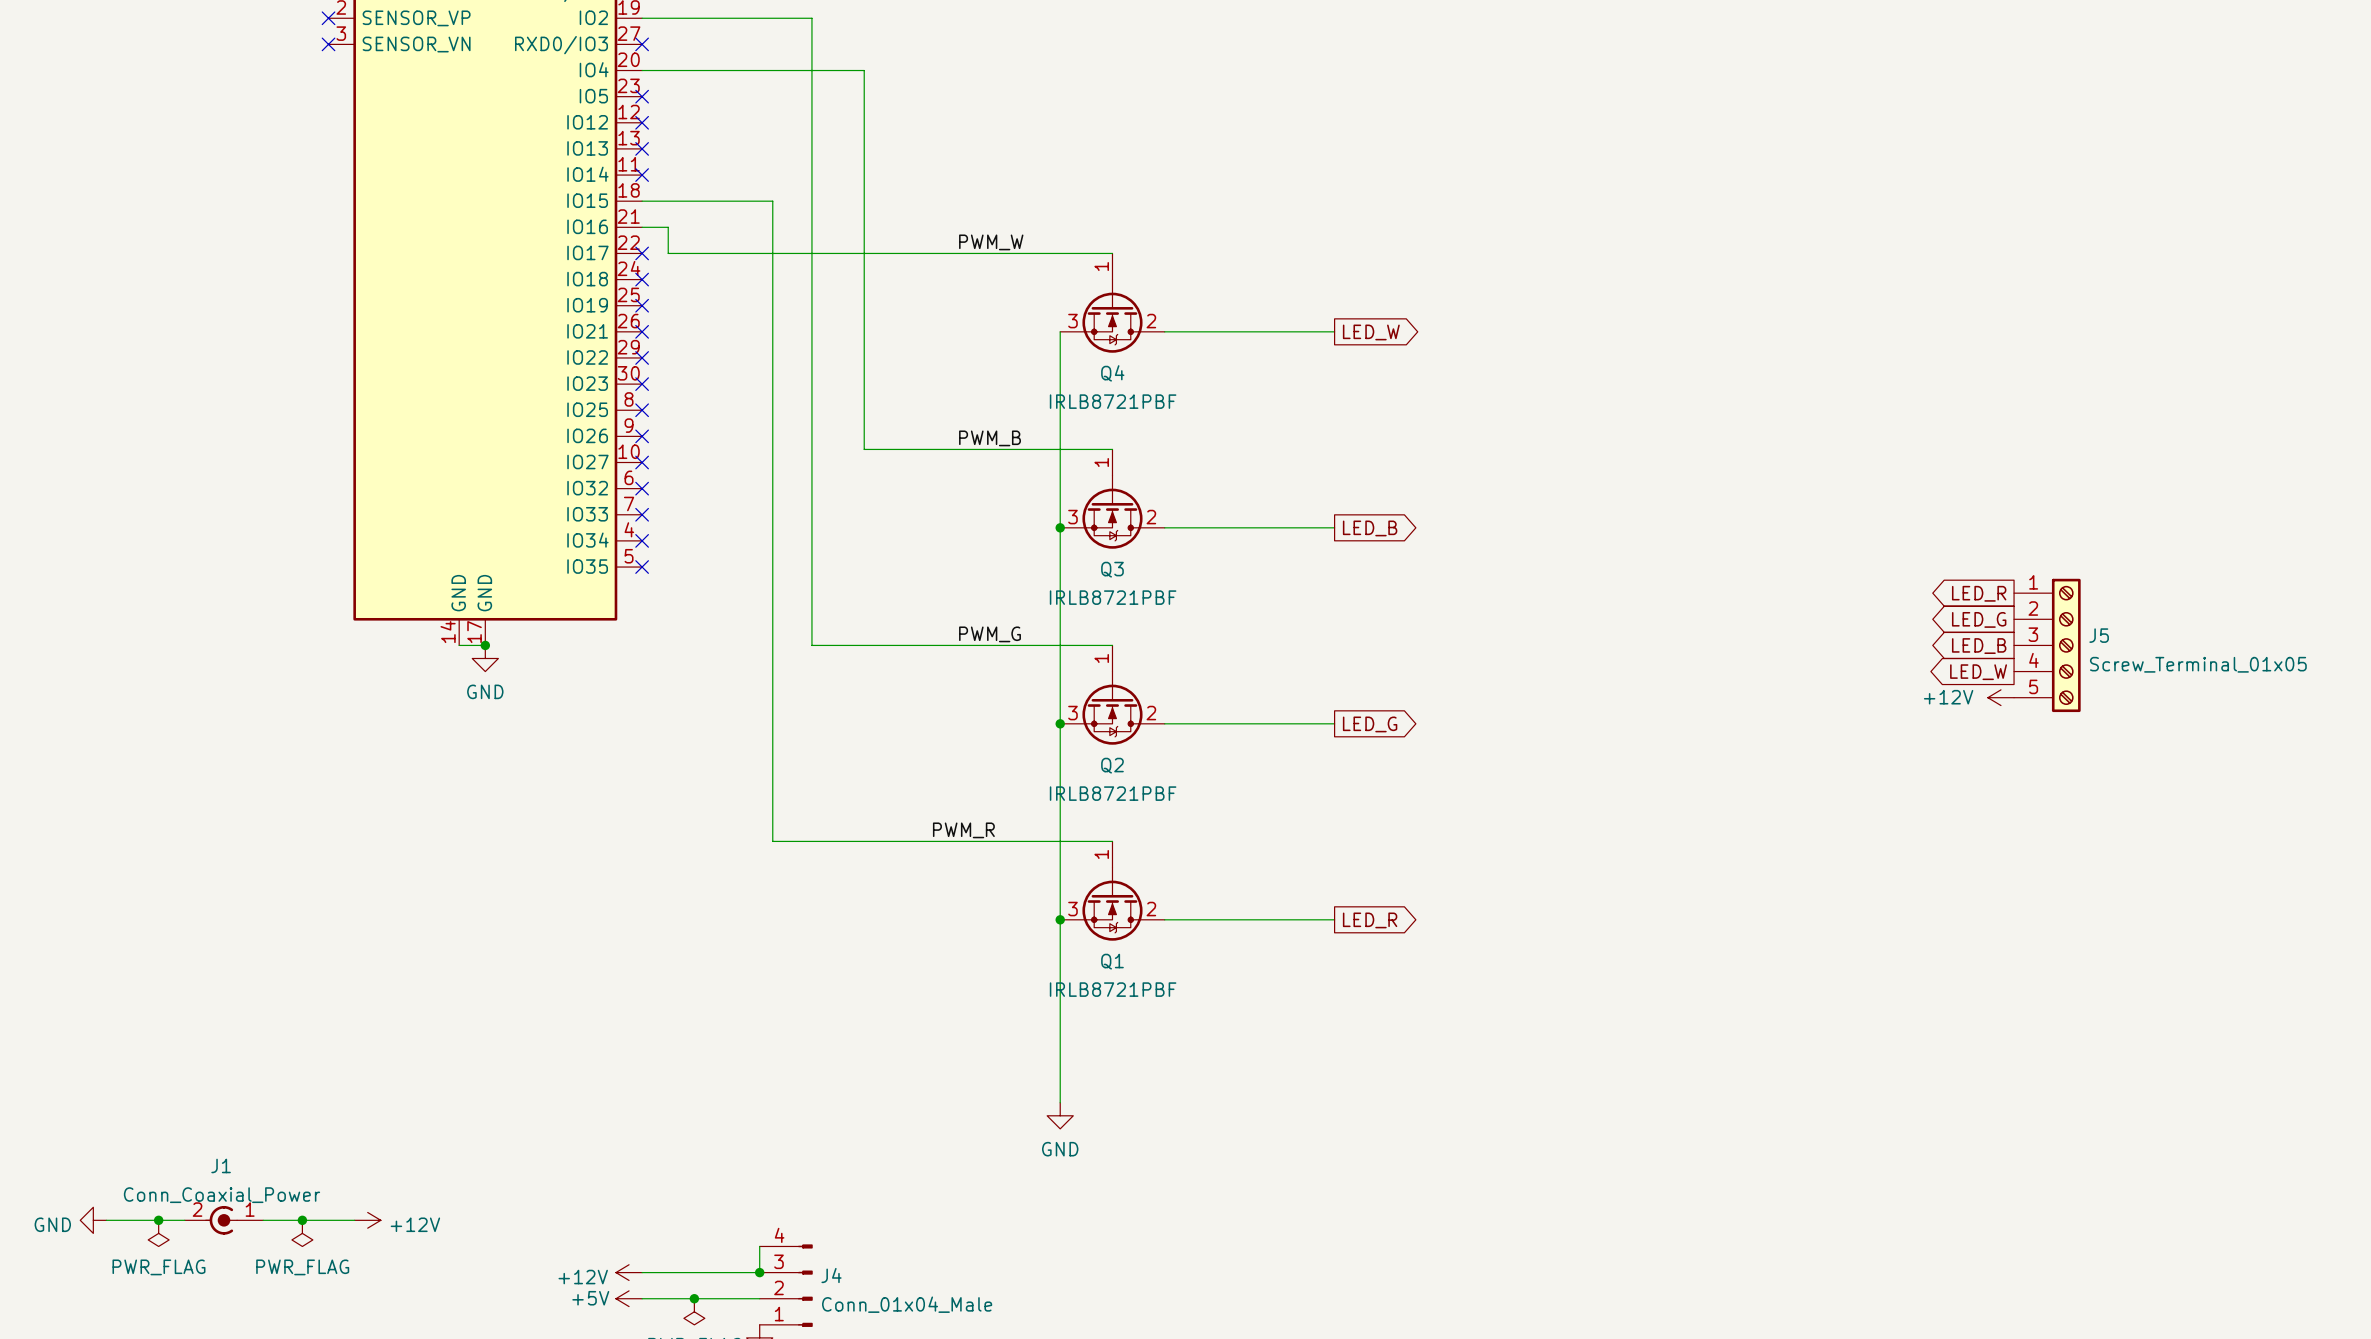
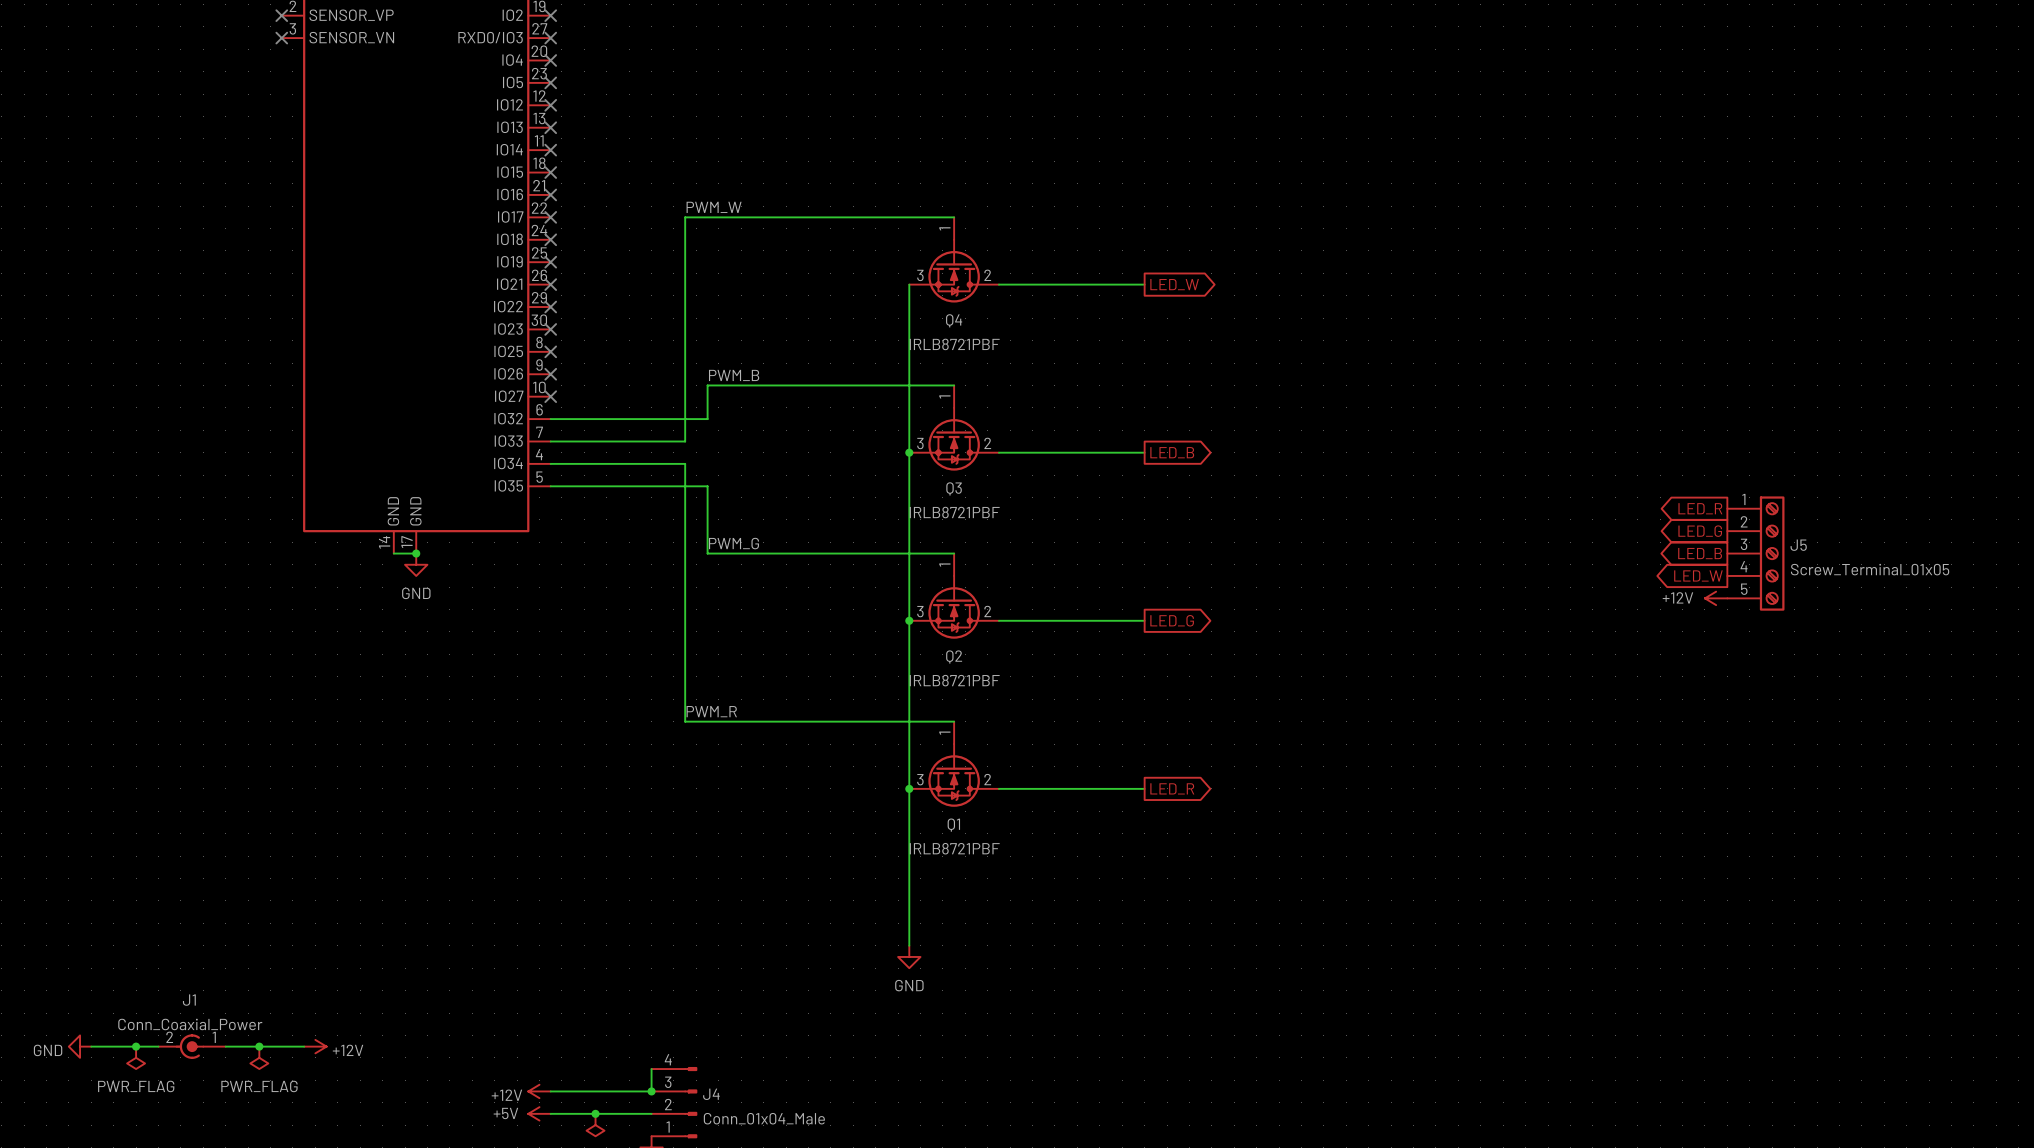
wire: (642, 18) (811, 18) (811, 645) (825, 645) -> (550, 486) (707, 486) (707, 553)
no-connect mark: none -> (550, 15)
wire: (642, 70) (864, 70) (864, 449) -> (550, 419) (707, 419) (707, 385) (741, 385)
no-connect mark: none -> (550, 60)
wire: (642, 201) (772, 201) (772, 841) (798, 841) -> (550, 463) (685, 463) (685, 721)
no-connect mark: none -> (550, 172)
wire: (642, 227) (668, 227) (668, 253) (798, 253) -> (550, 441) (685, 441) (685, 217)
no-connect mark: none -> (550, 194)
label position: PWM_W (991, 242) -> PWM_W (714, 207)
label position: PWM_B (990, 438) -> PWM_B (734, 375)
no-connect mark: (642, 488) -> none
no-connect mark: (642, 514) -> none
no-connect mark: (642, 540) -> none
no-connect mark: (642, 567) -> none
label position: PWM_G (990, 634) -> PWM_G (733, 543)
label position: PWM_R (963, 830) -> PWM_R (711, 711)

